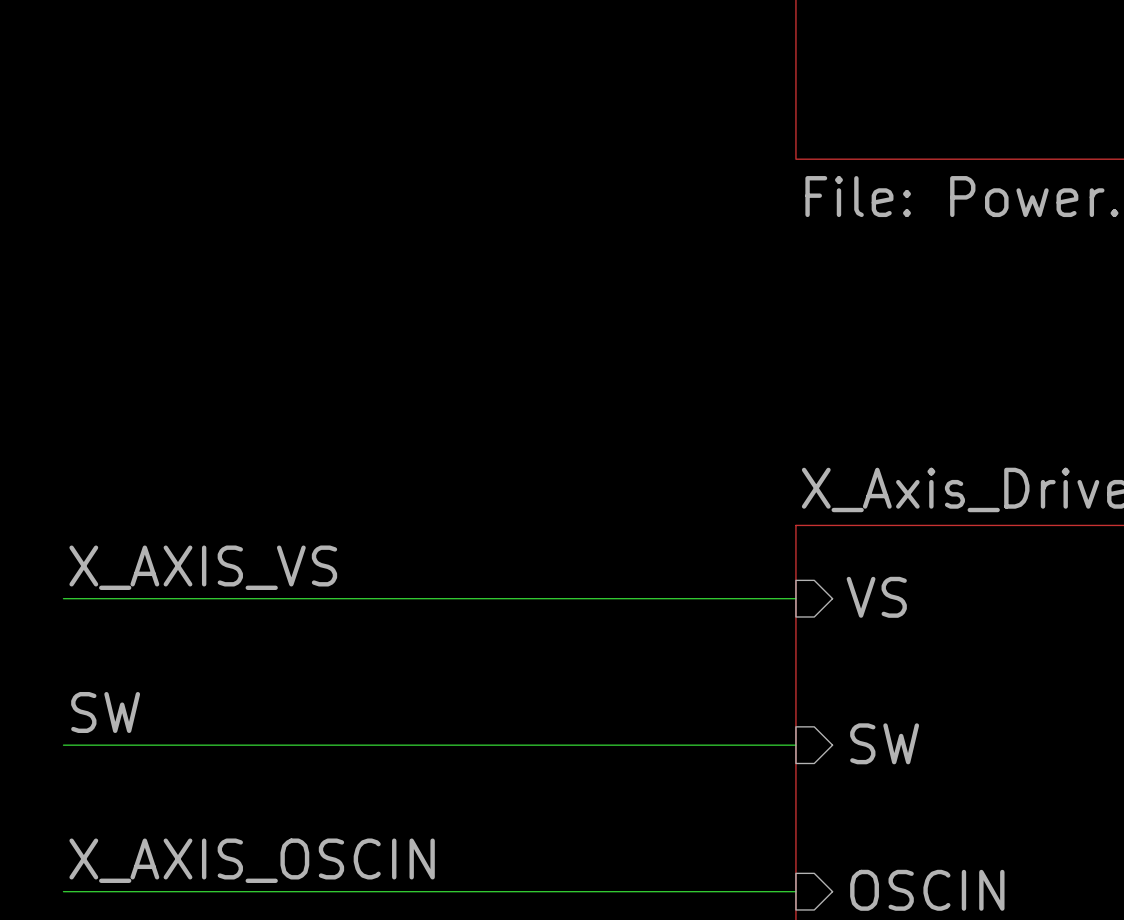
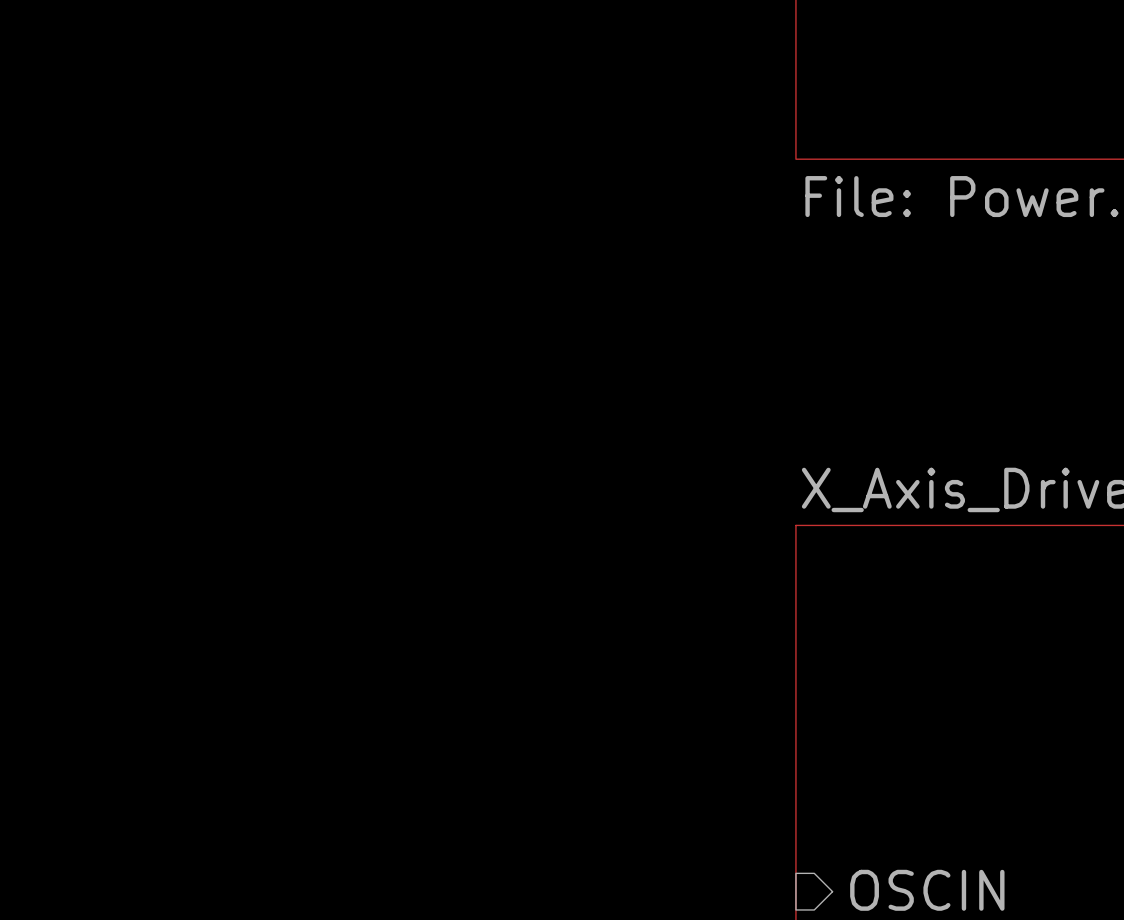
label: X_AXIS_VS (203, 567) -> none
sheet pin: VS (876, 597) -> none
wire: (63, 598) (795, 598) -> none
label: SW (105, 712) -> none
sheet pin: SW (884, 743) -> none
wire: (63, 745) (795, 745) -> none
label: X_AXIS_OSCIN (252, 860) -> none
wire: (63, 891) (795, 891) -> none

